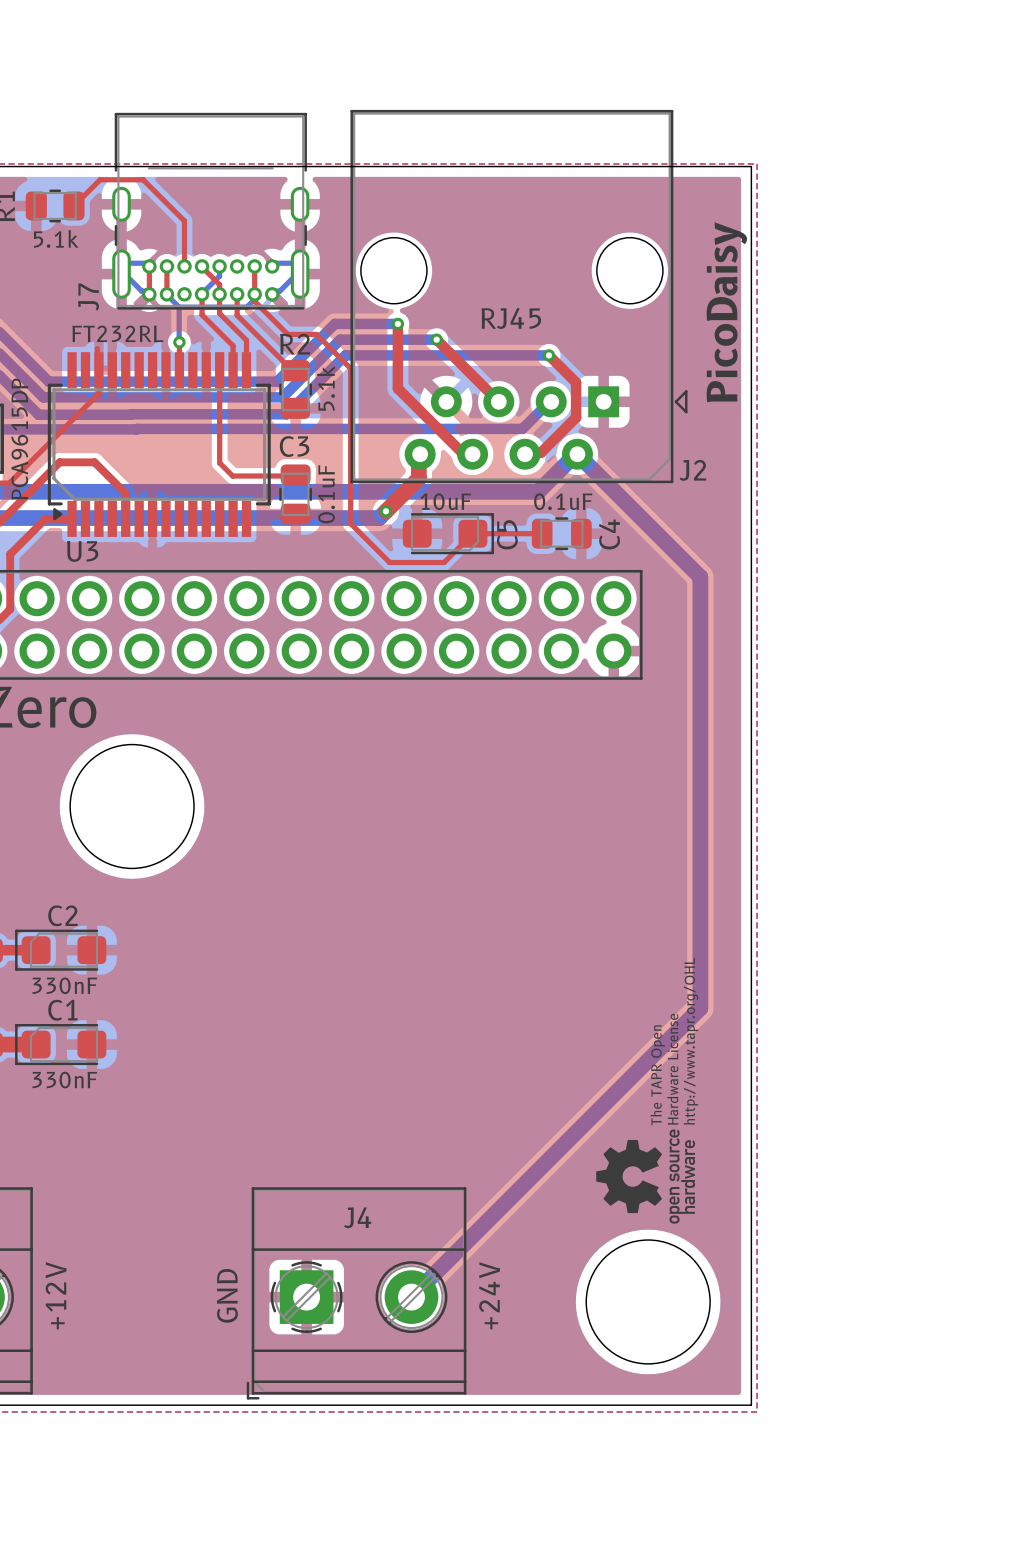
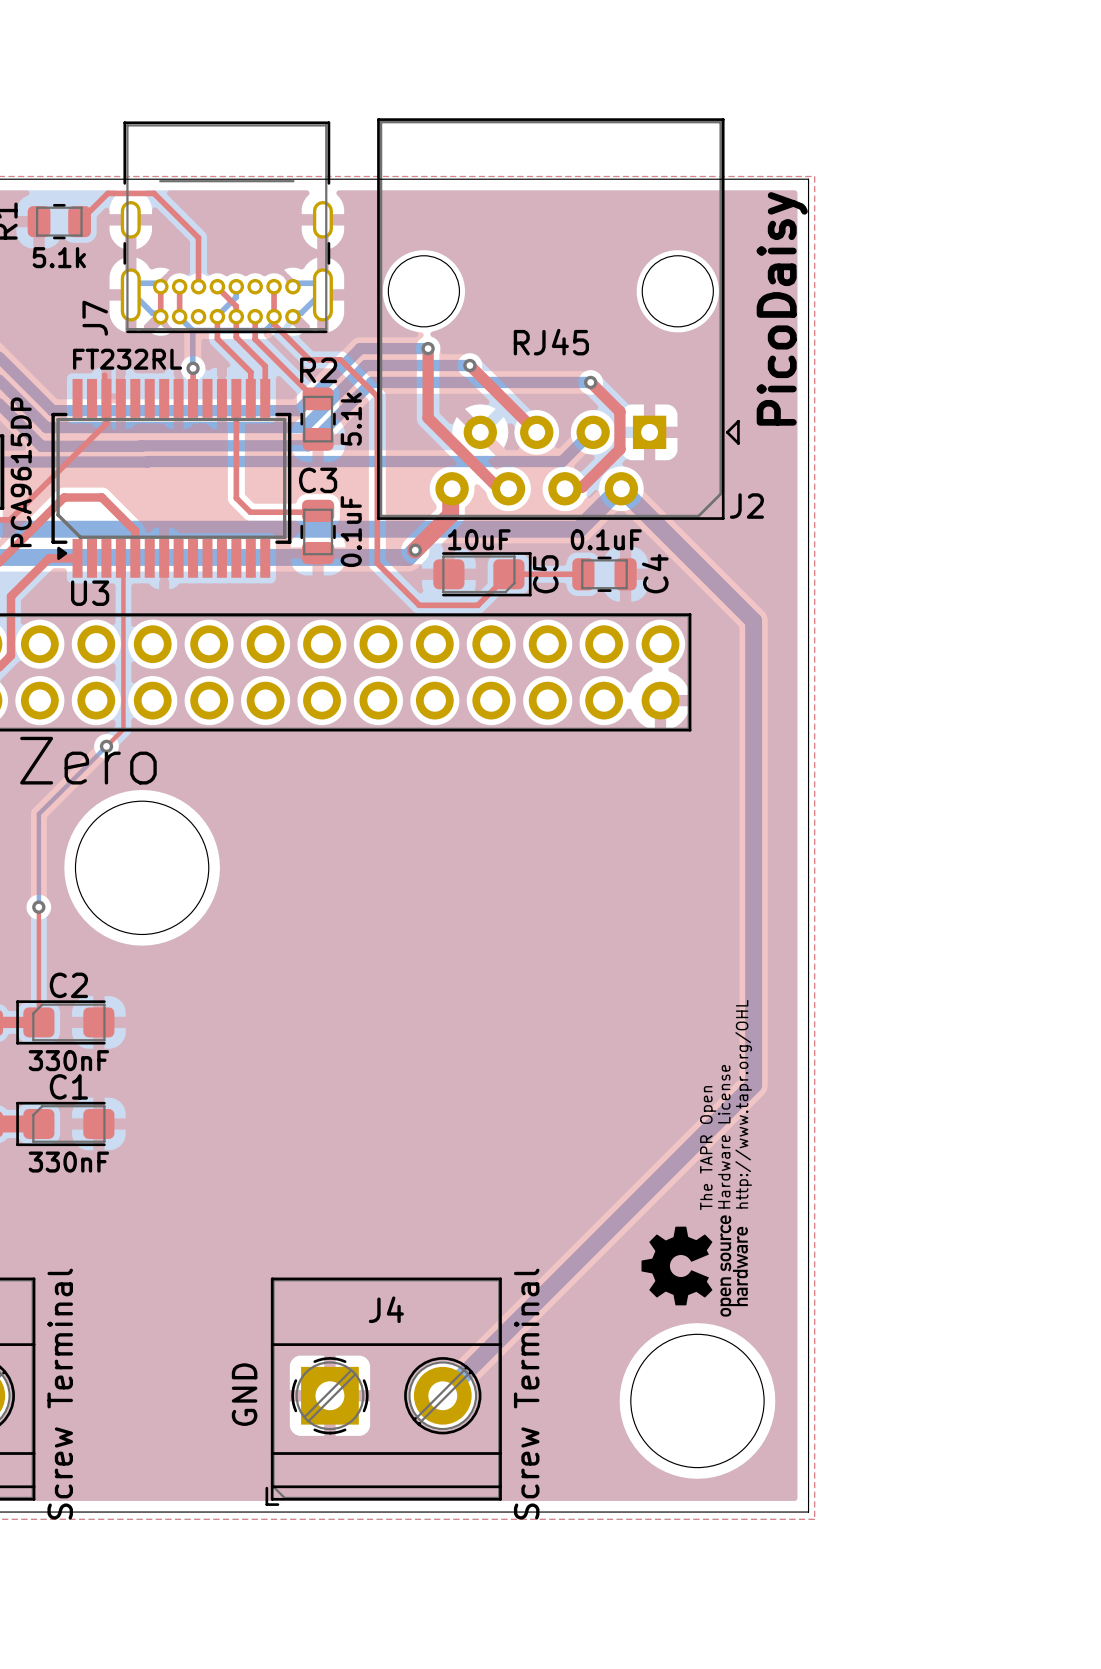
top track: none -> (120, 558) (123, 560) (123, 729) (106, 746)
bottom track: none -> (106, 746) (38, 813) (38, 907)
via: none -> (106, 746)
top track: none -> (38, 907) (38, 1022)
via: none -> (38, 907)
part value: +12V (56, 1295) -> Screw Terminal (60, 1394)
J4 value: +24V (489, 1295) -> Screw Terminal (526, 1394)

